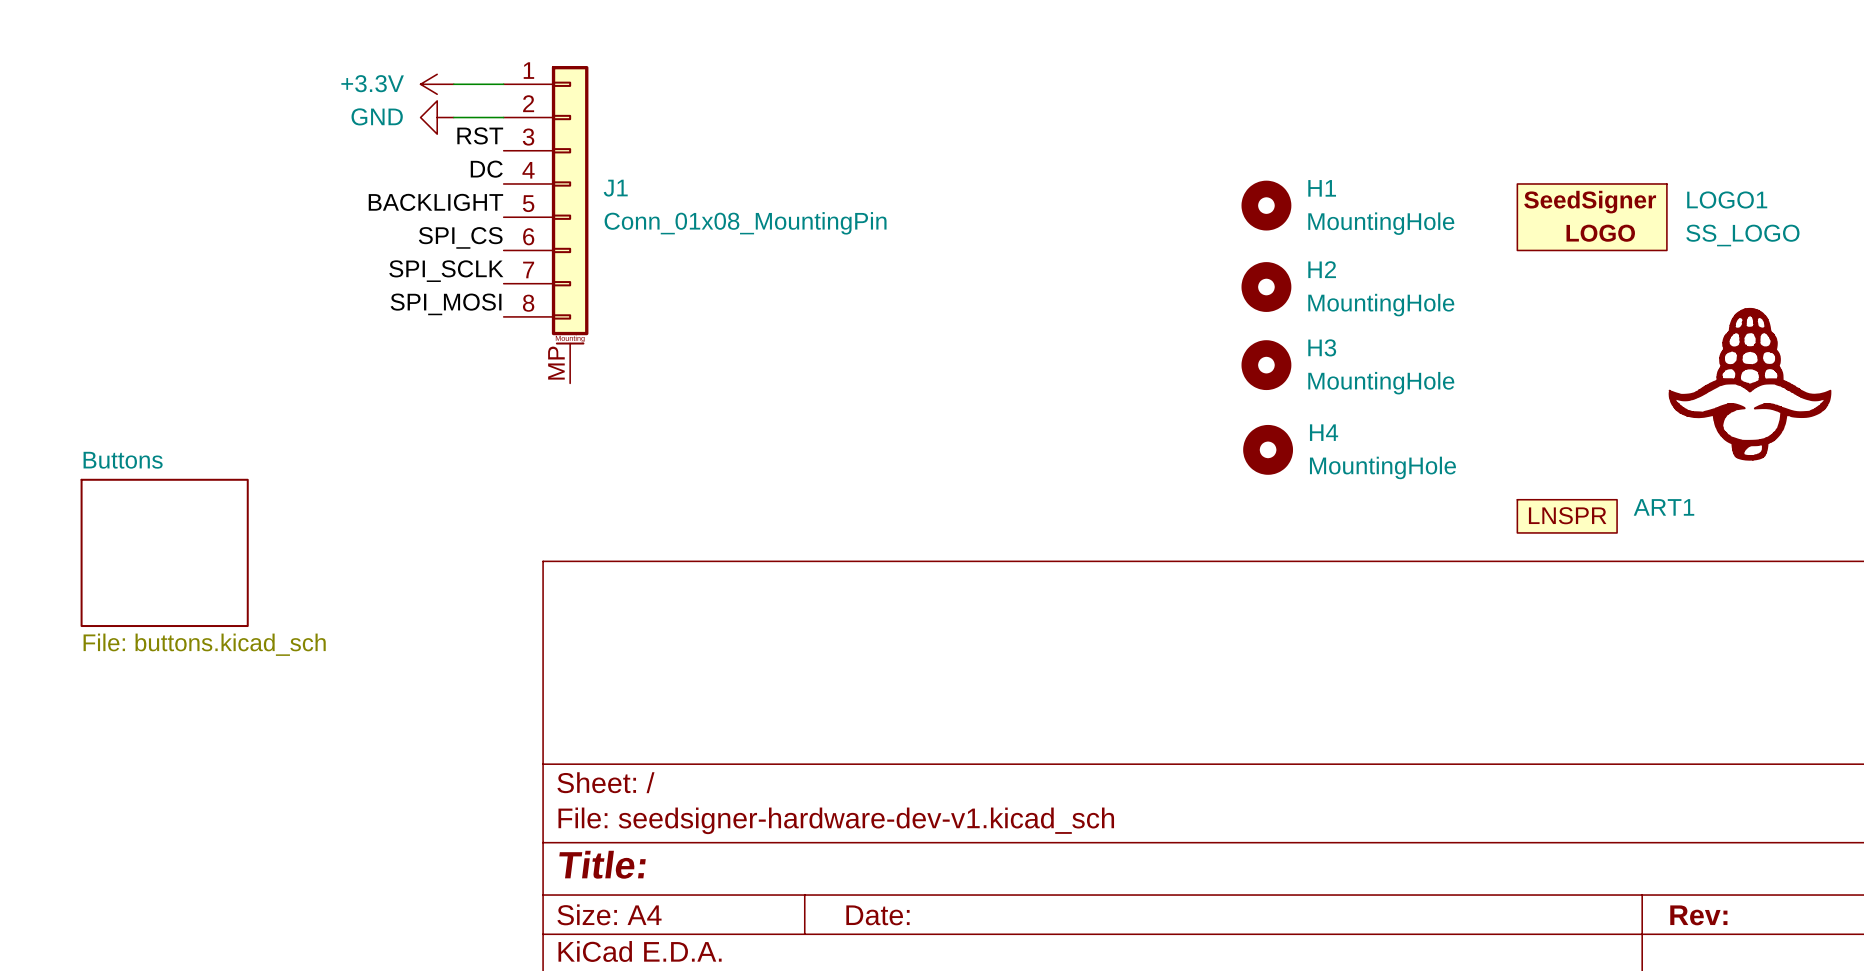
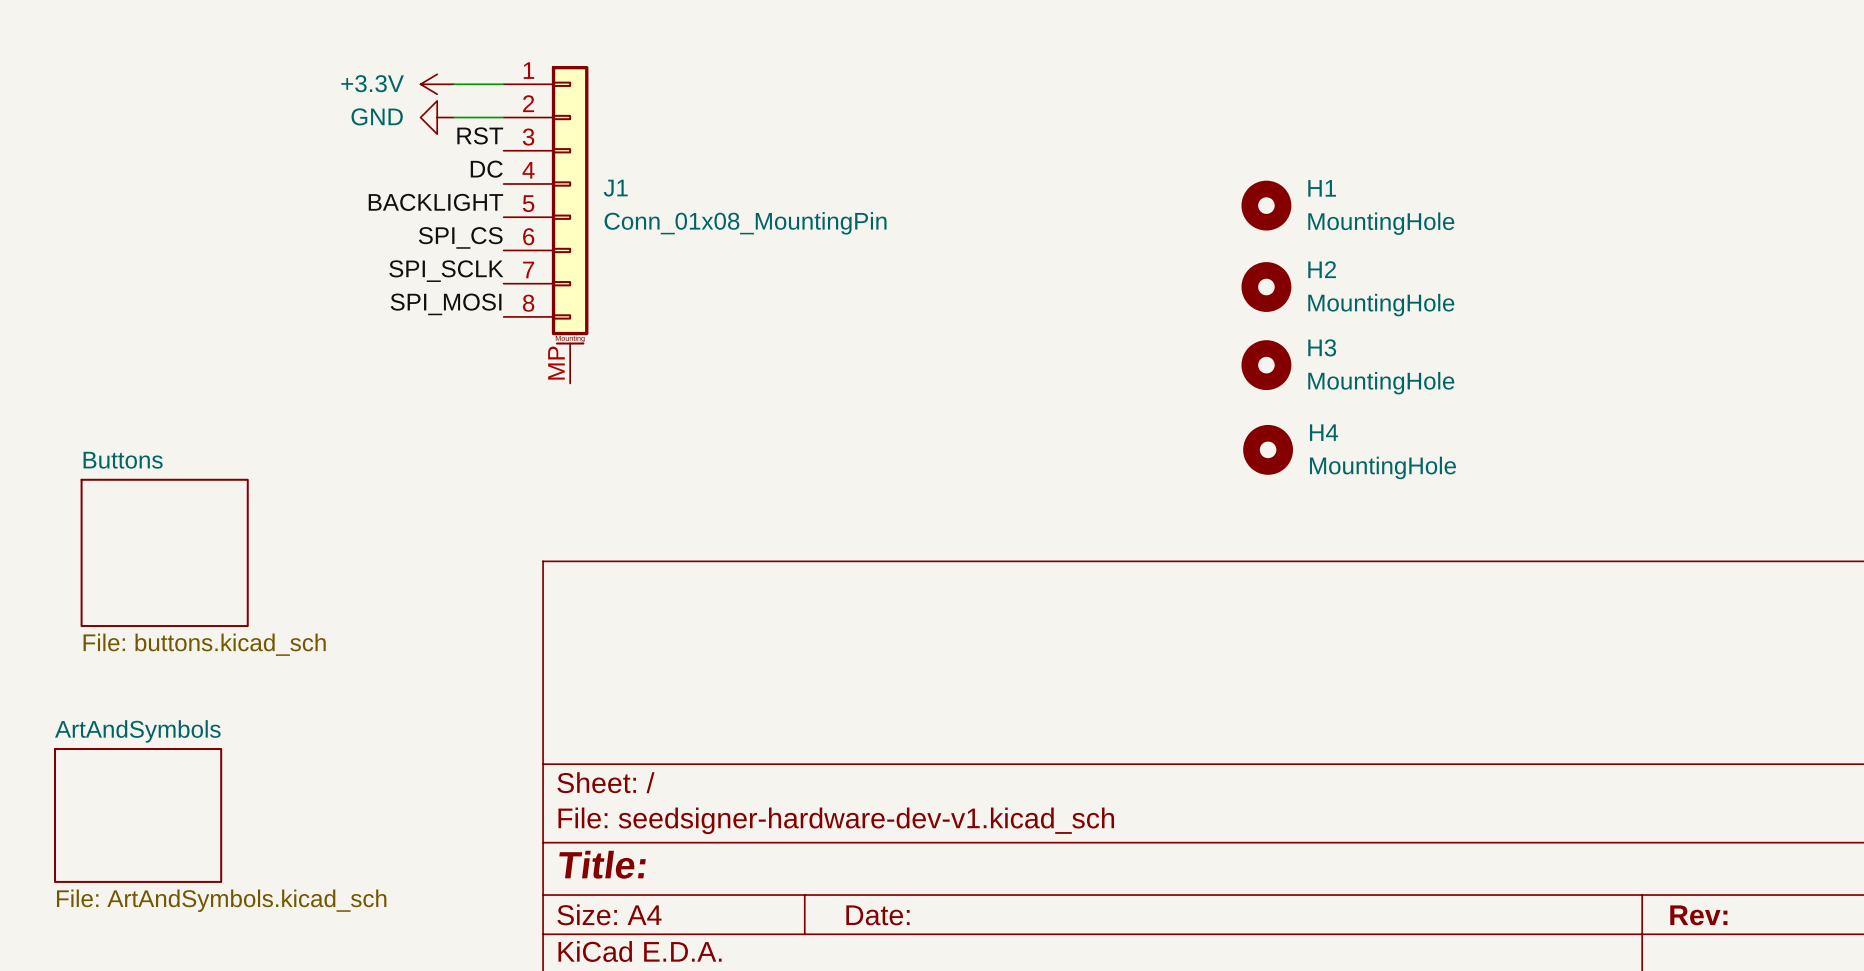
LOGO1: SS_LOGO (1592, 217) -> none
part: (1750, 384) -> none
ART1: (1567, 516) -> none
sheet ArtAndSymbols: none -> File: ArtAndSymbols.kicad_sch (138, 815)

